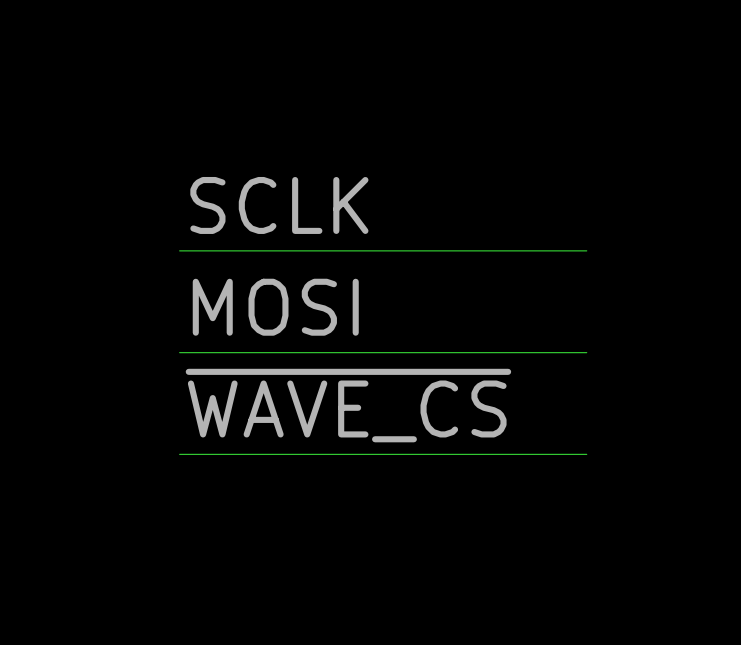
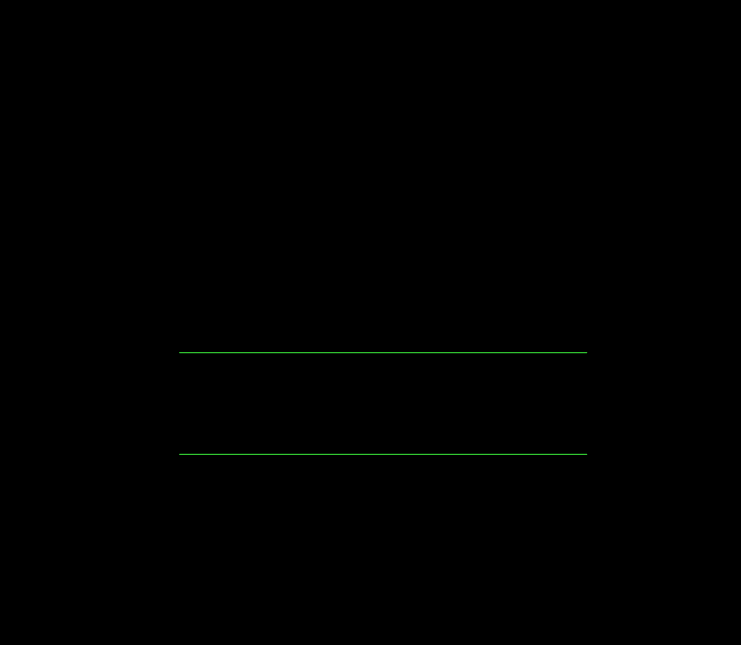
label: SCLK (279, 205) -> none
wire: (179, 250) (586, 250) -> none
label: MOSI (275, 307) -> none
label: ~{WAVE_CS} (348, 405) -> none

